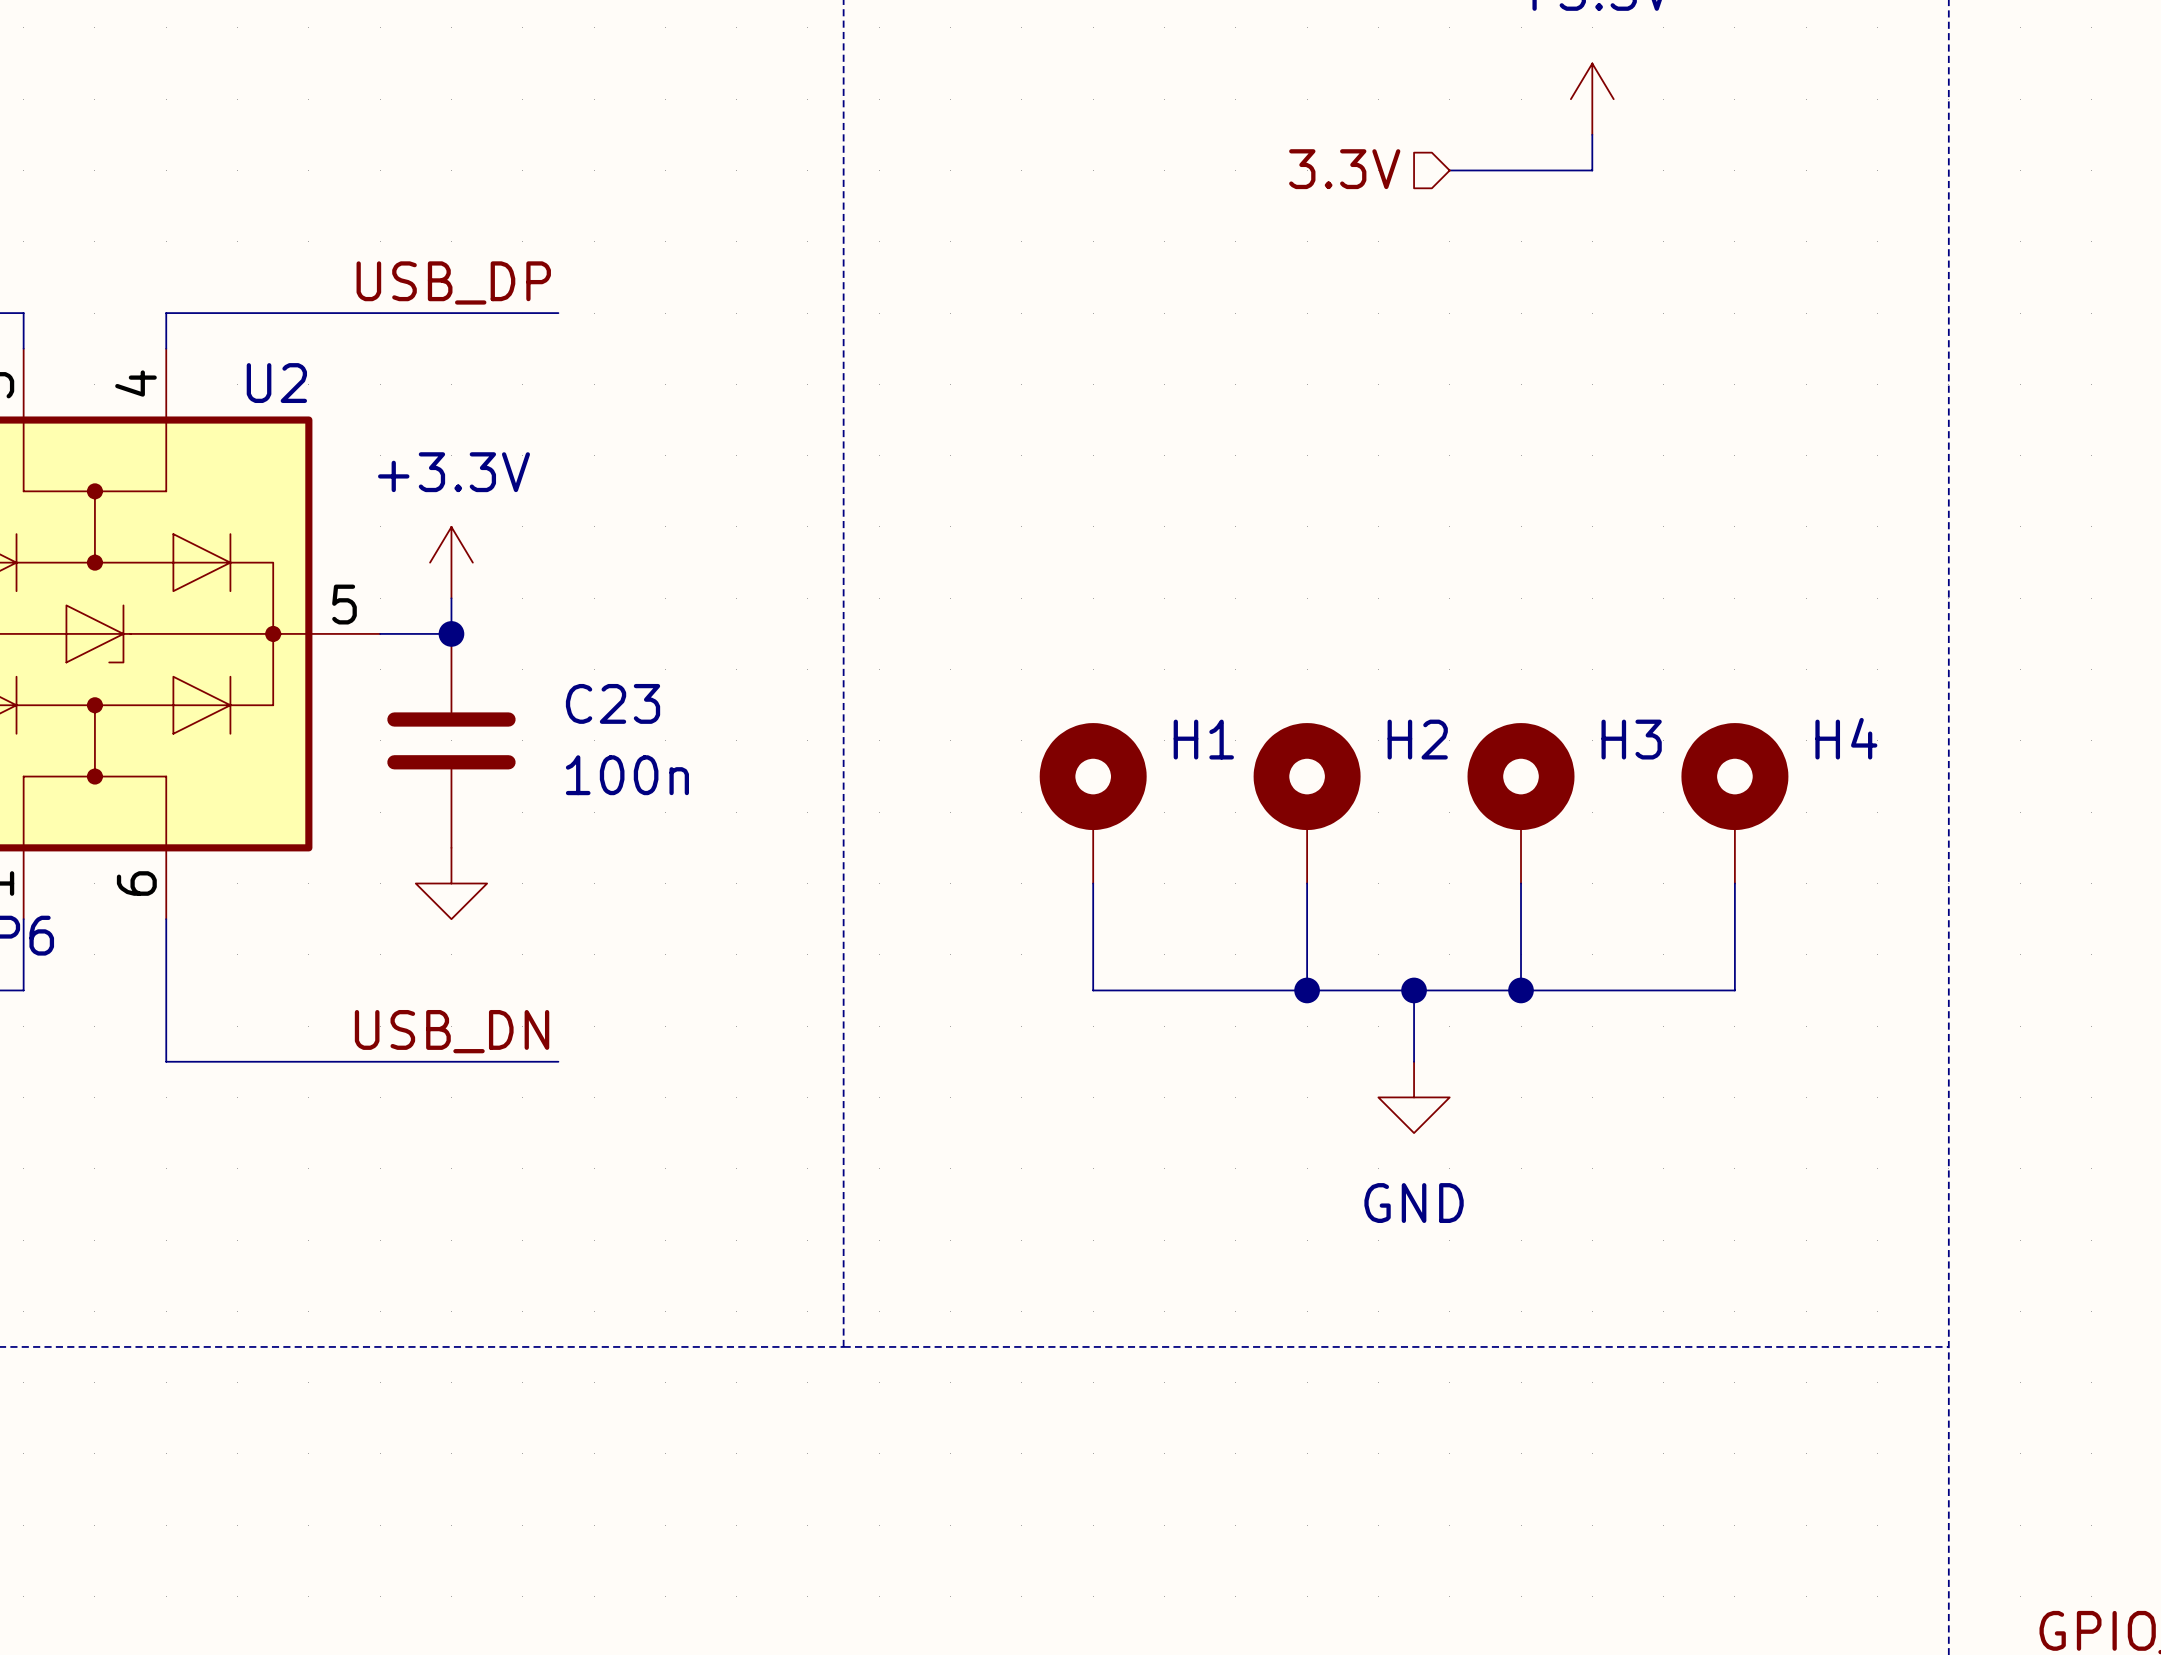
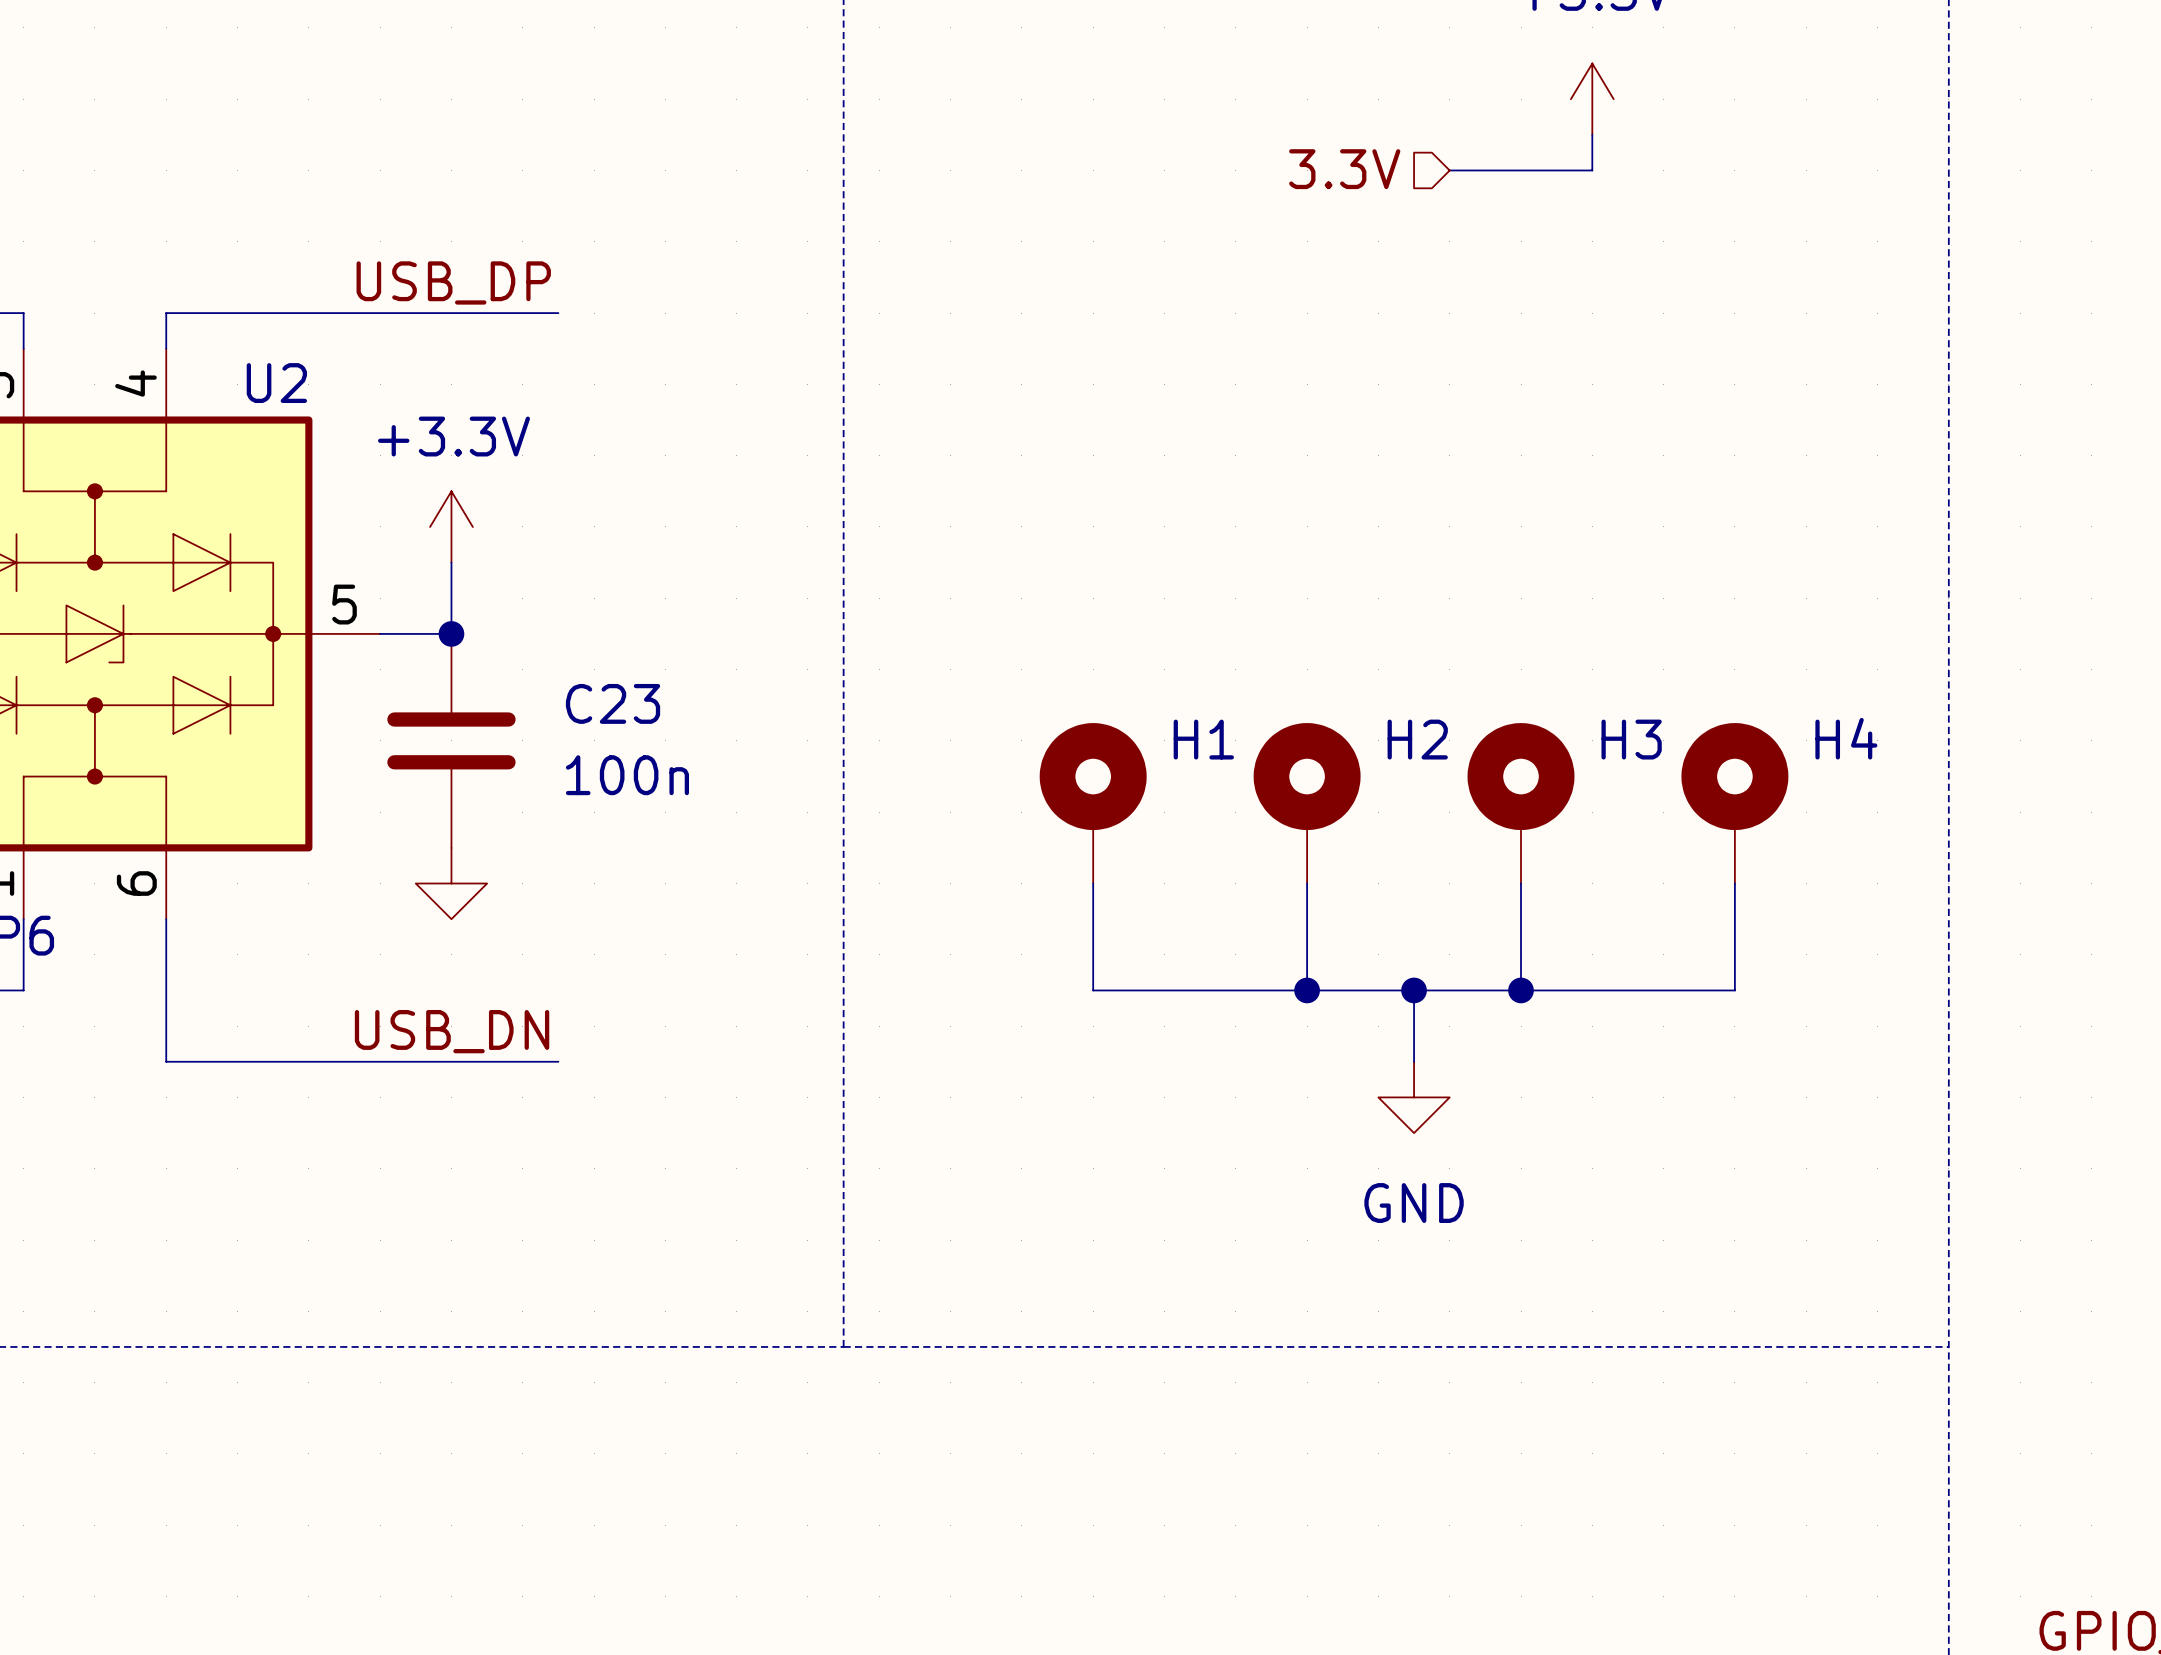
power symbol position: +3.3V (451, 562) -> +3.3V (451, 526)

